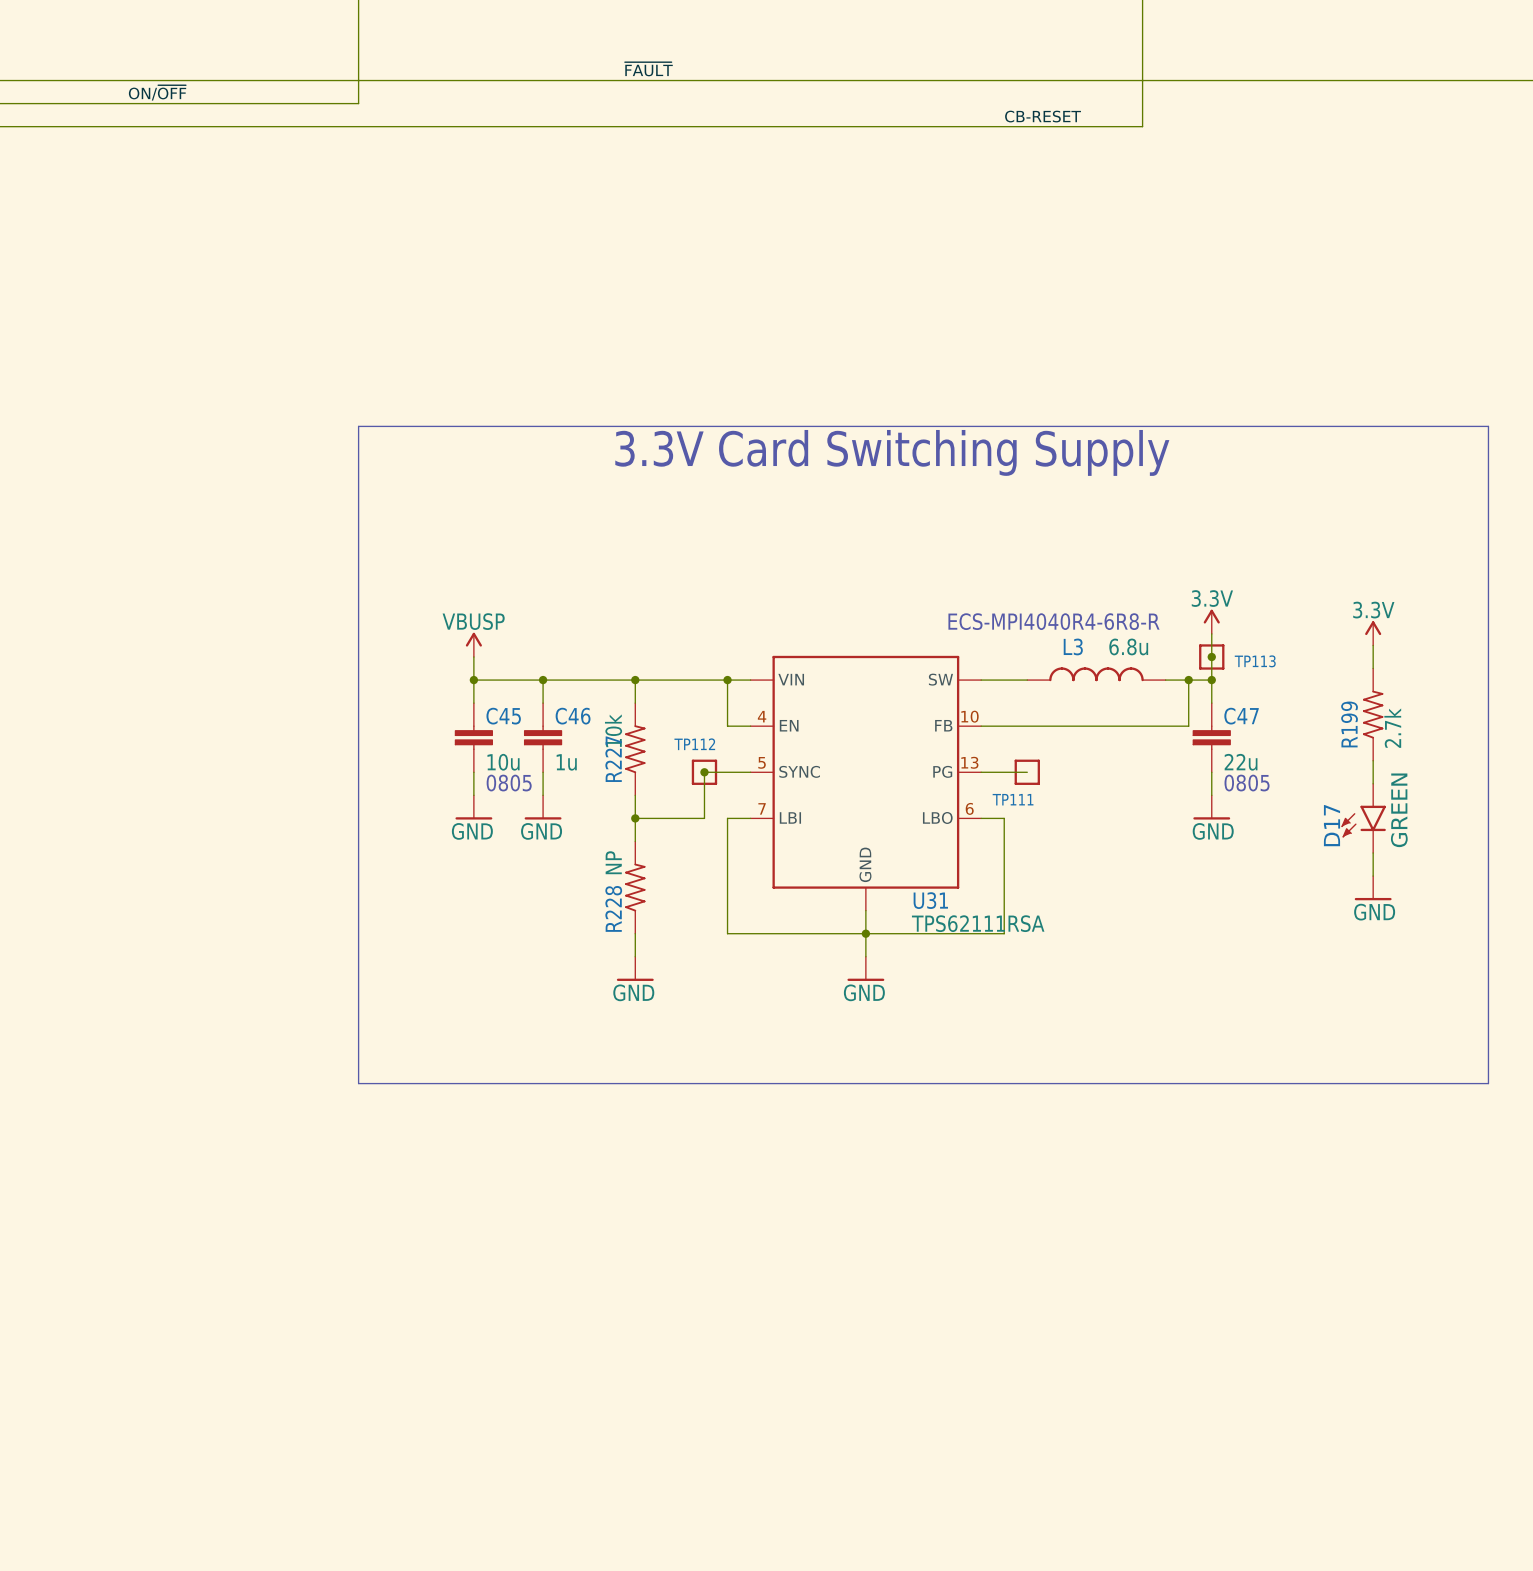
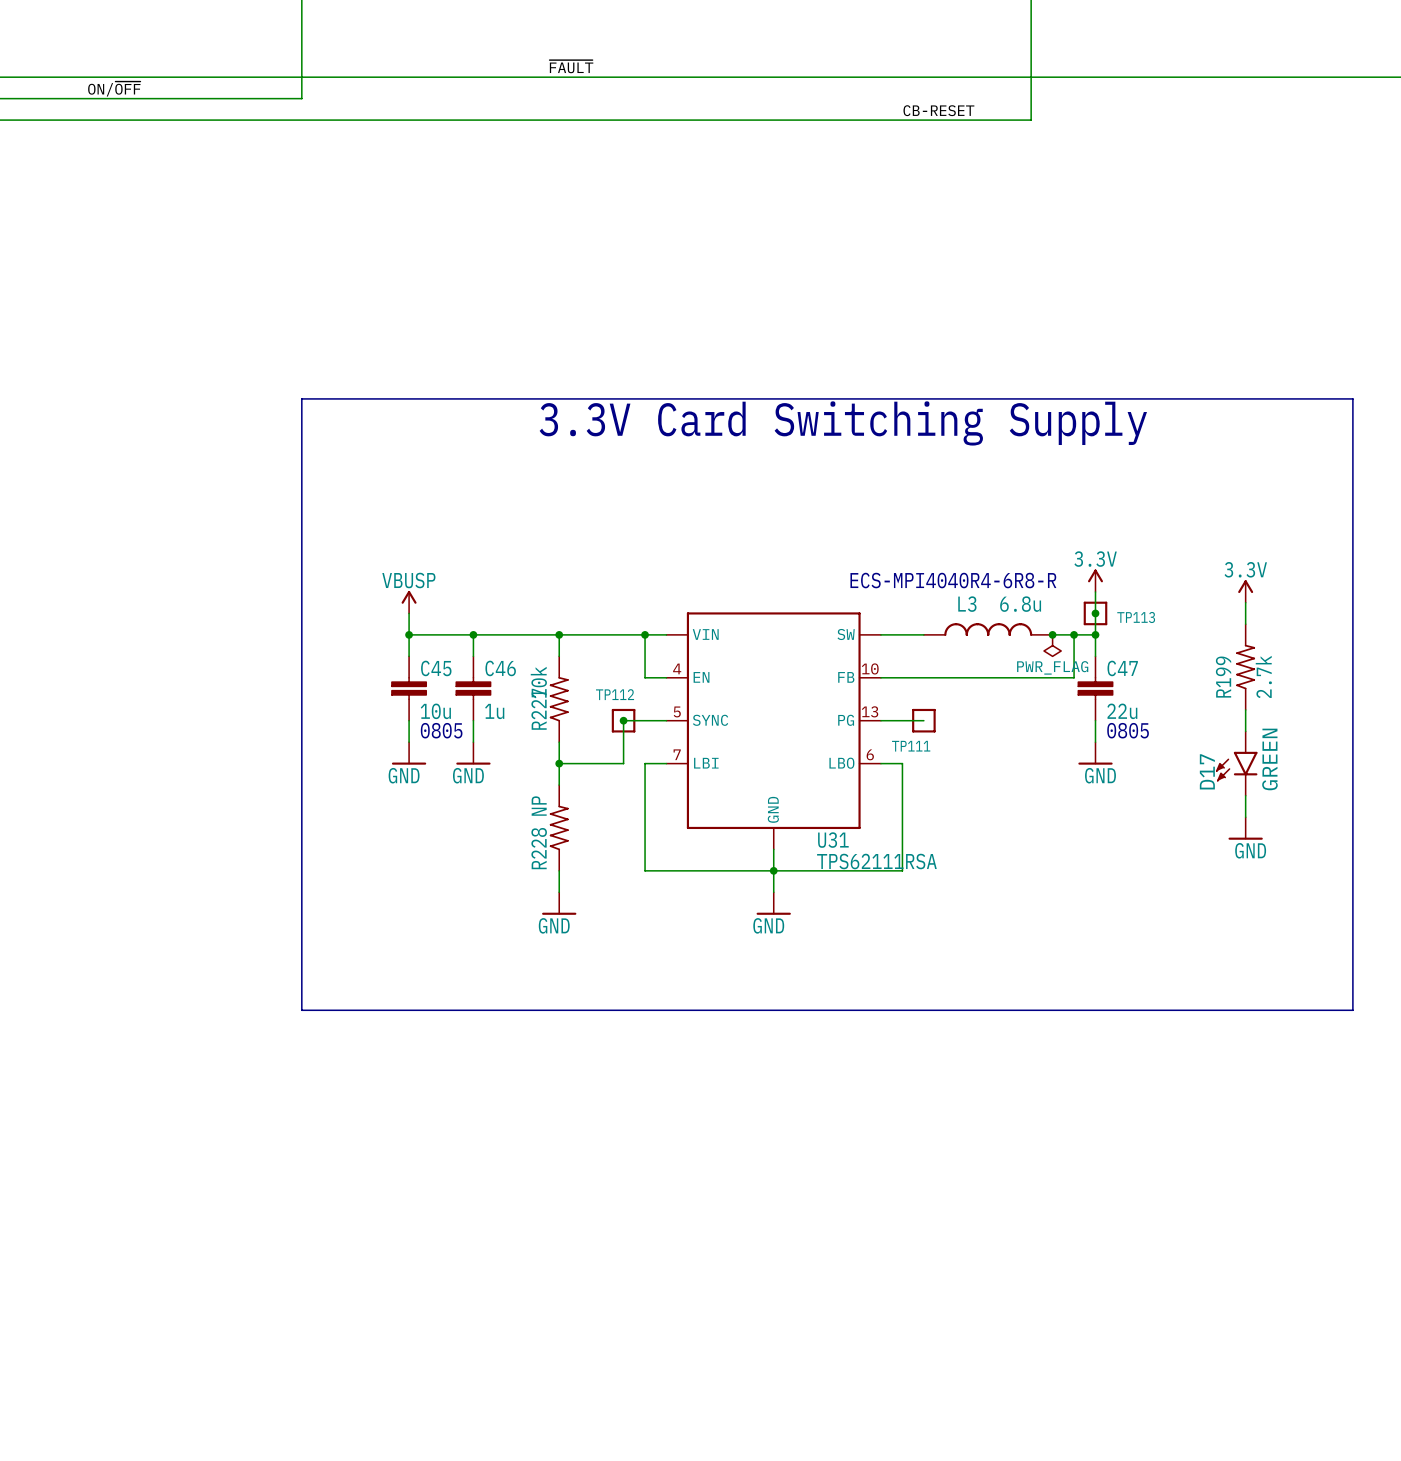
junction: none -> (1052, 634)
power symbol: none -> PWR_FLAG (1052, 645)

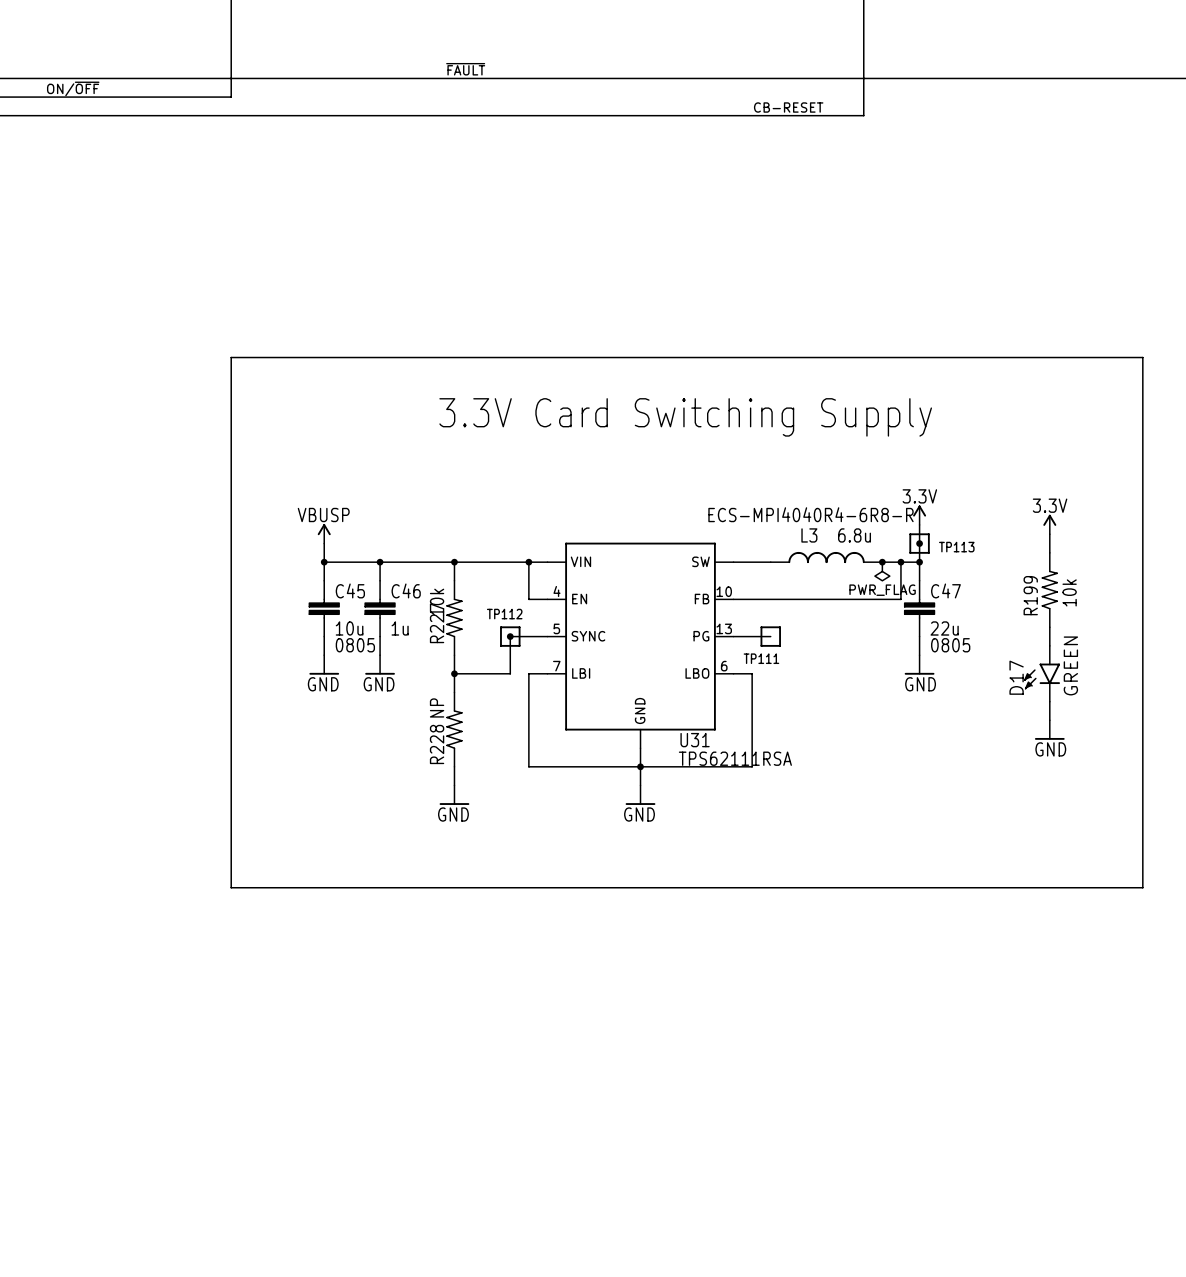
text position: 3.3V Card Switching Supply (843, 423) -> 3.3V Card Switching Supply (685, 417)
R199 value: 2.7k (1263, 676) -> 10k (1069, 592)

